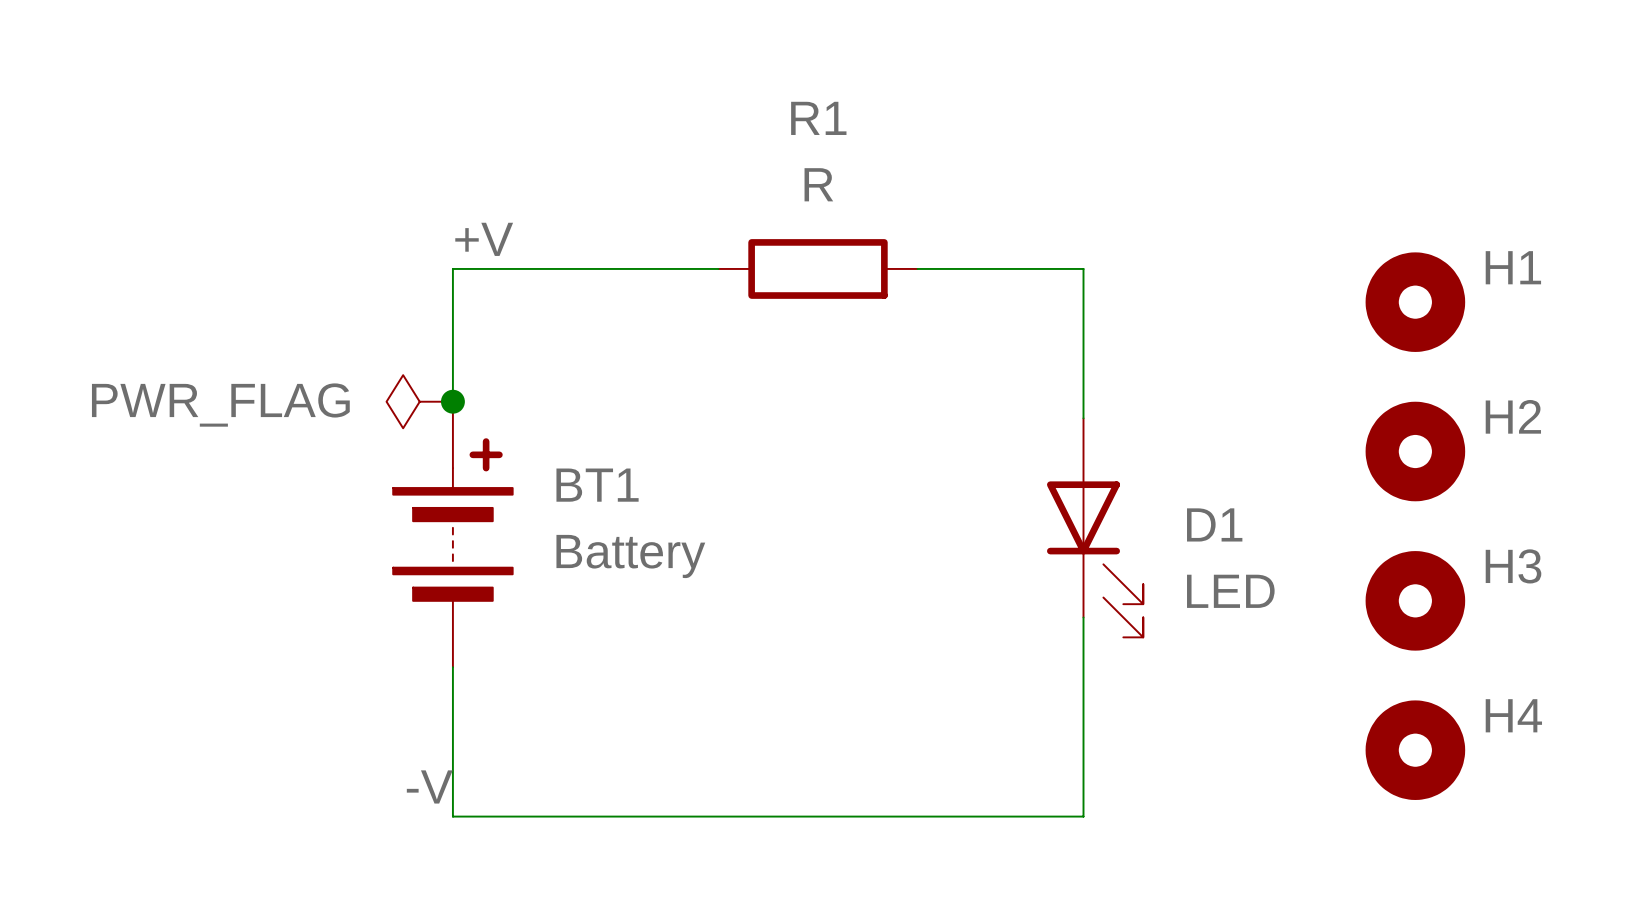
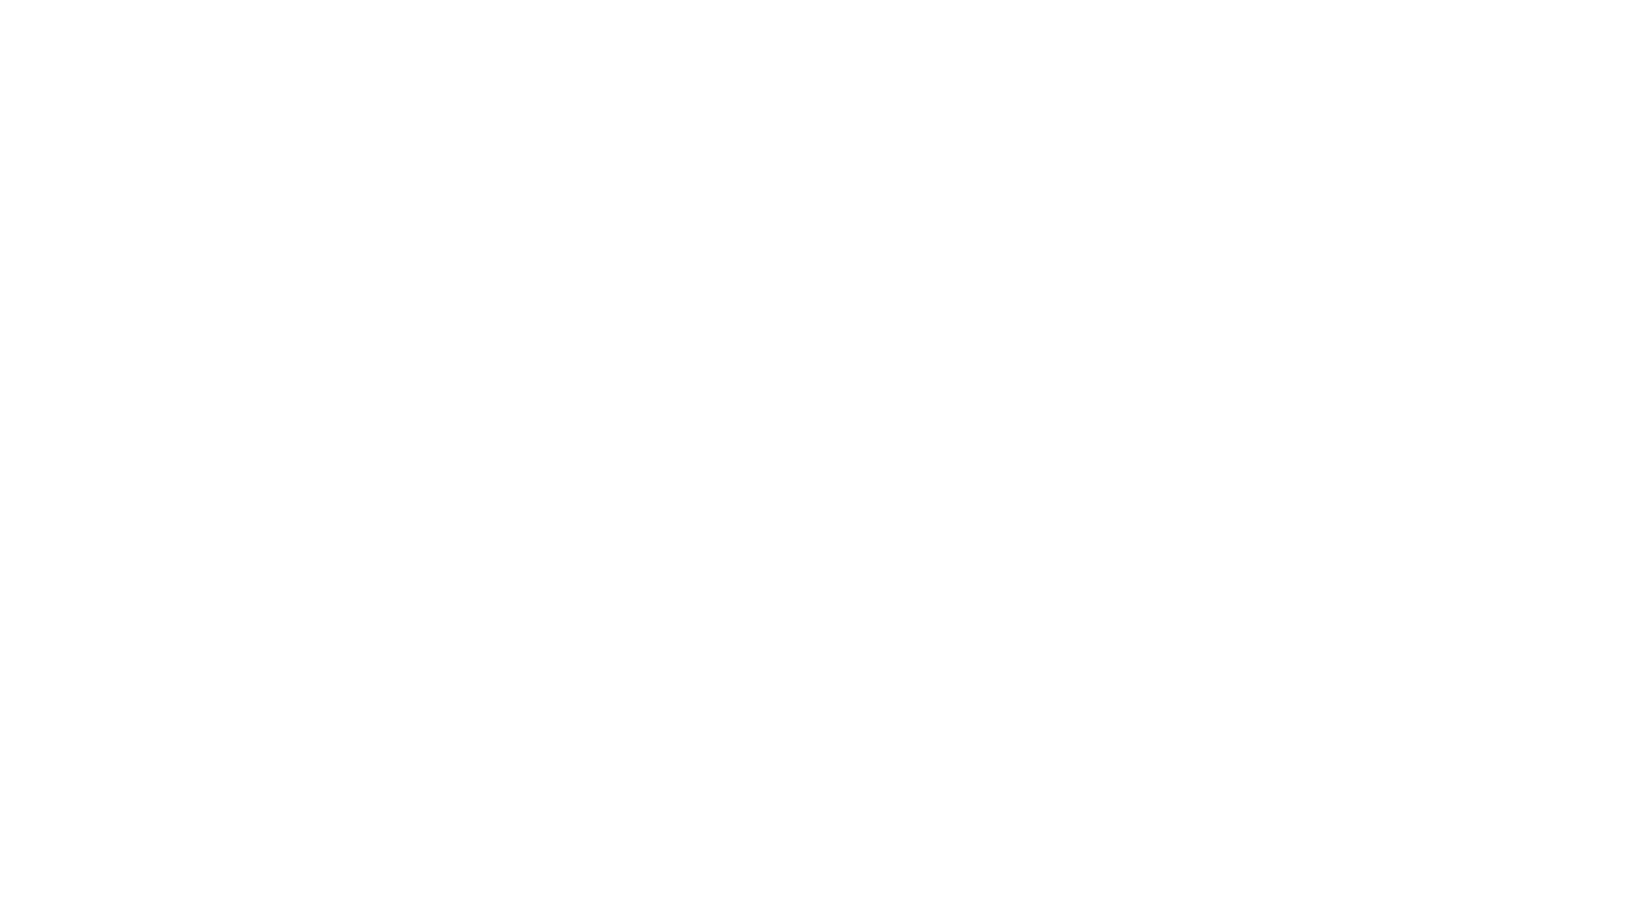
label: +V (484, 239) -> none
wire: (718, 268) (452, 268) (452, 401) -> none
R1: R (818, 268) -> none
wire: (917, 268) (1083, 268) (1083, 418) -> none
H1: (1415, 302) -> none
power symbol: PWR_FLAG (419, 401) -> none
junction: (452, 401) -> none
H2: (1415, 451) -> none
D1: LED (1095, 527) -> none
BT1: Battery (452, 534) -> none
H3: (1415, 600) -> none
wire: (1083, 617) (1083, 816) (452, 816) (452, 667) -> none
H4: (1415, 750) -> none
label: -V (429, 786) -> none

